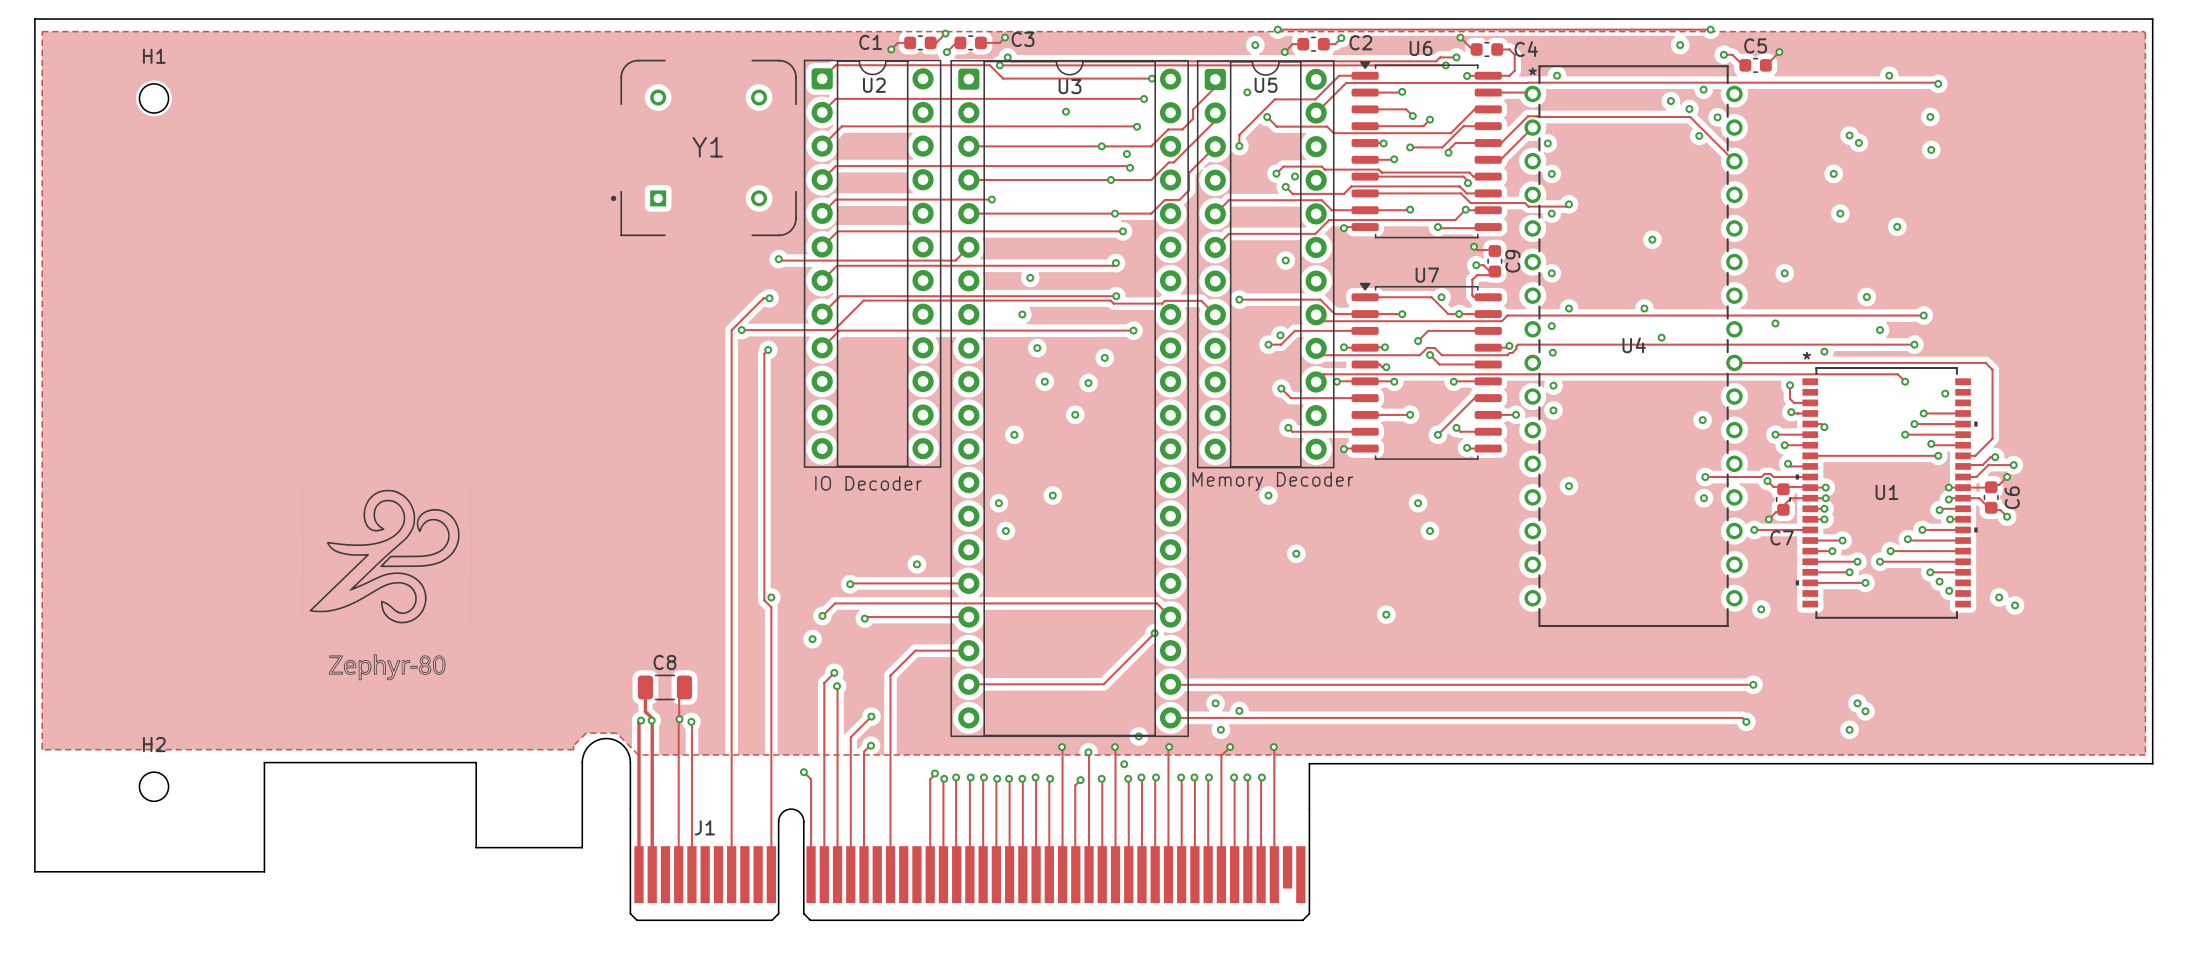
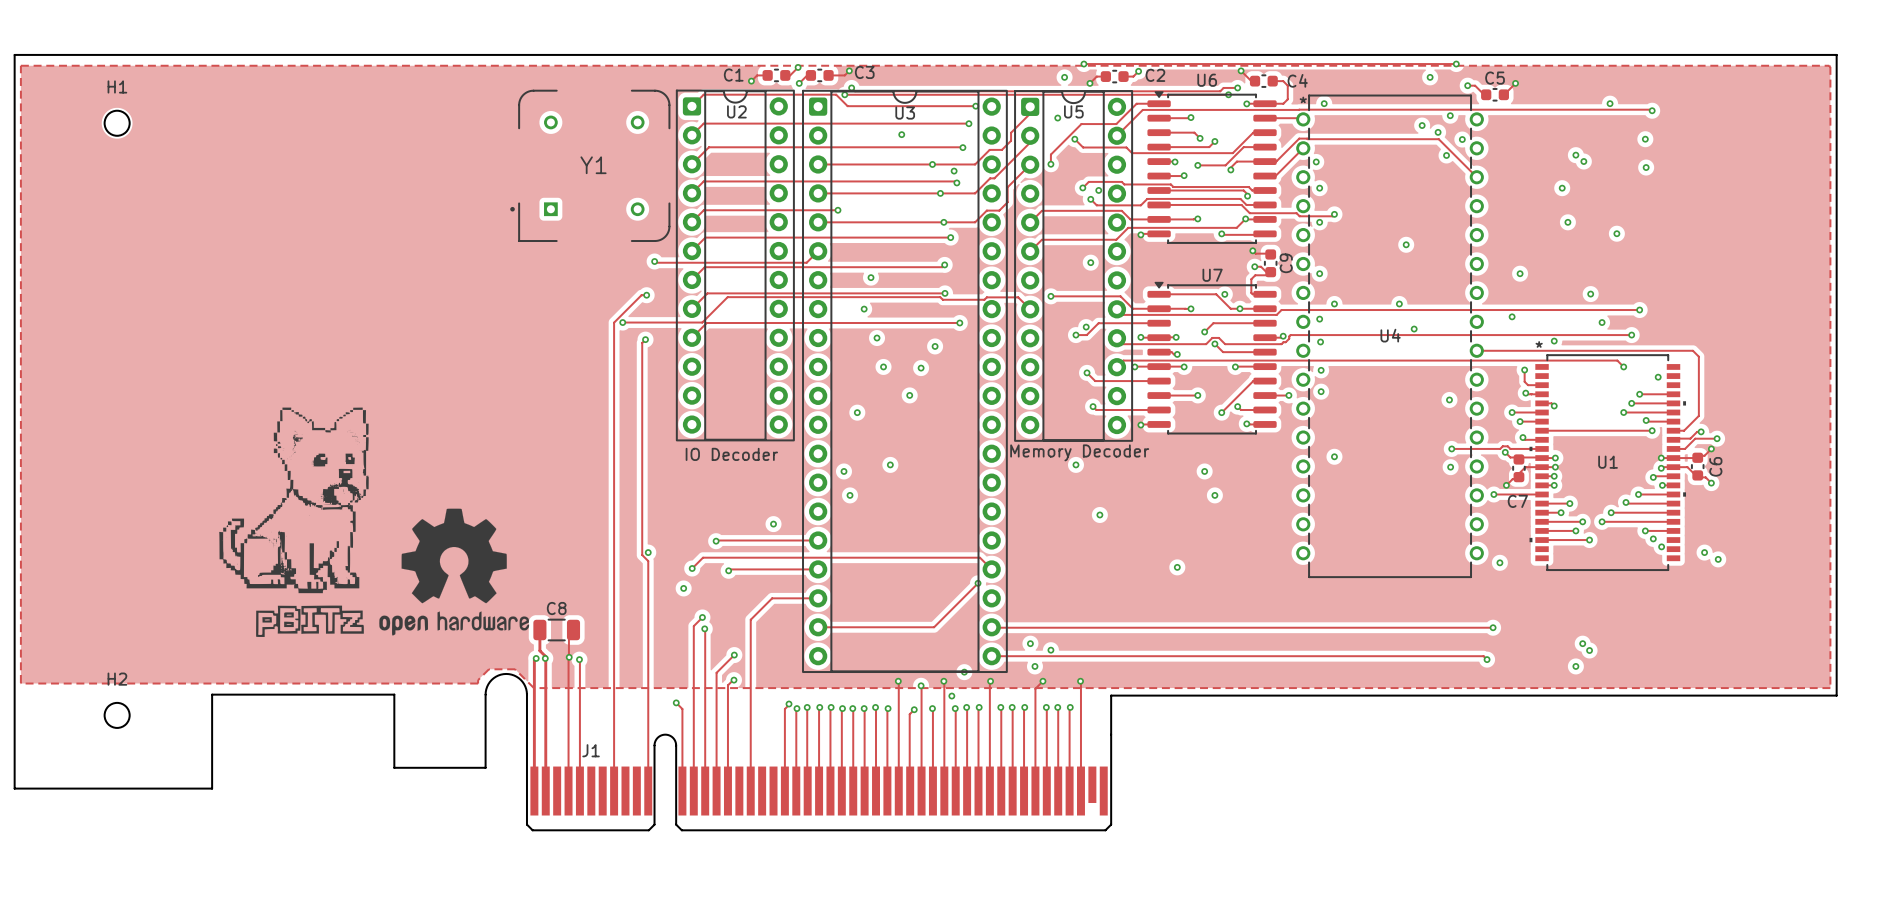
drawing: none -> [219, 407, 530, 637]
drawing: [302, 476, 471, 681] -> none

